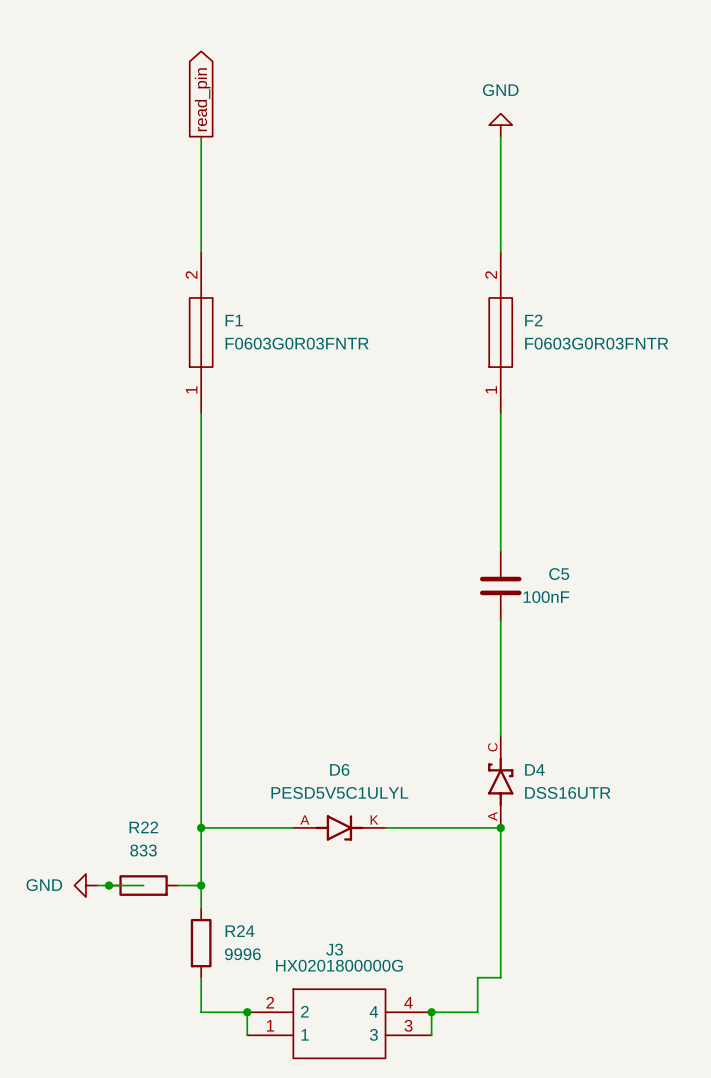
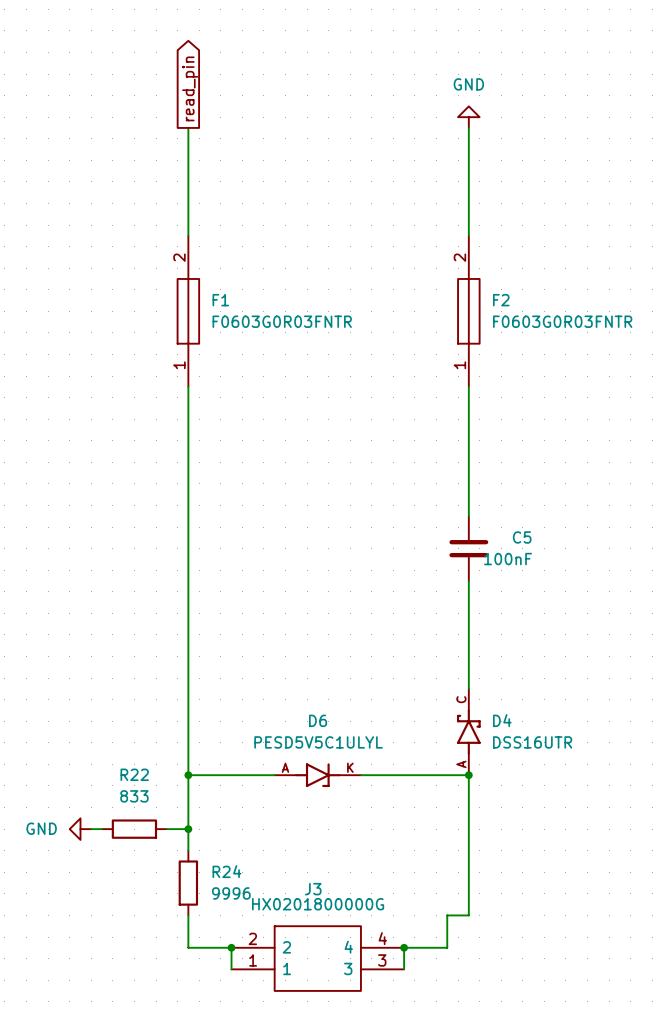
wire: (109, 885) (143, 885) -> none
junction: (109, 885) -> none

